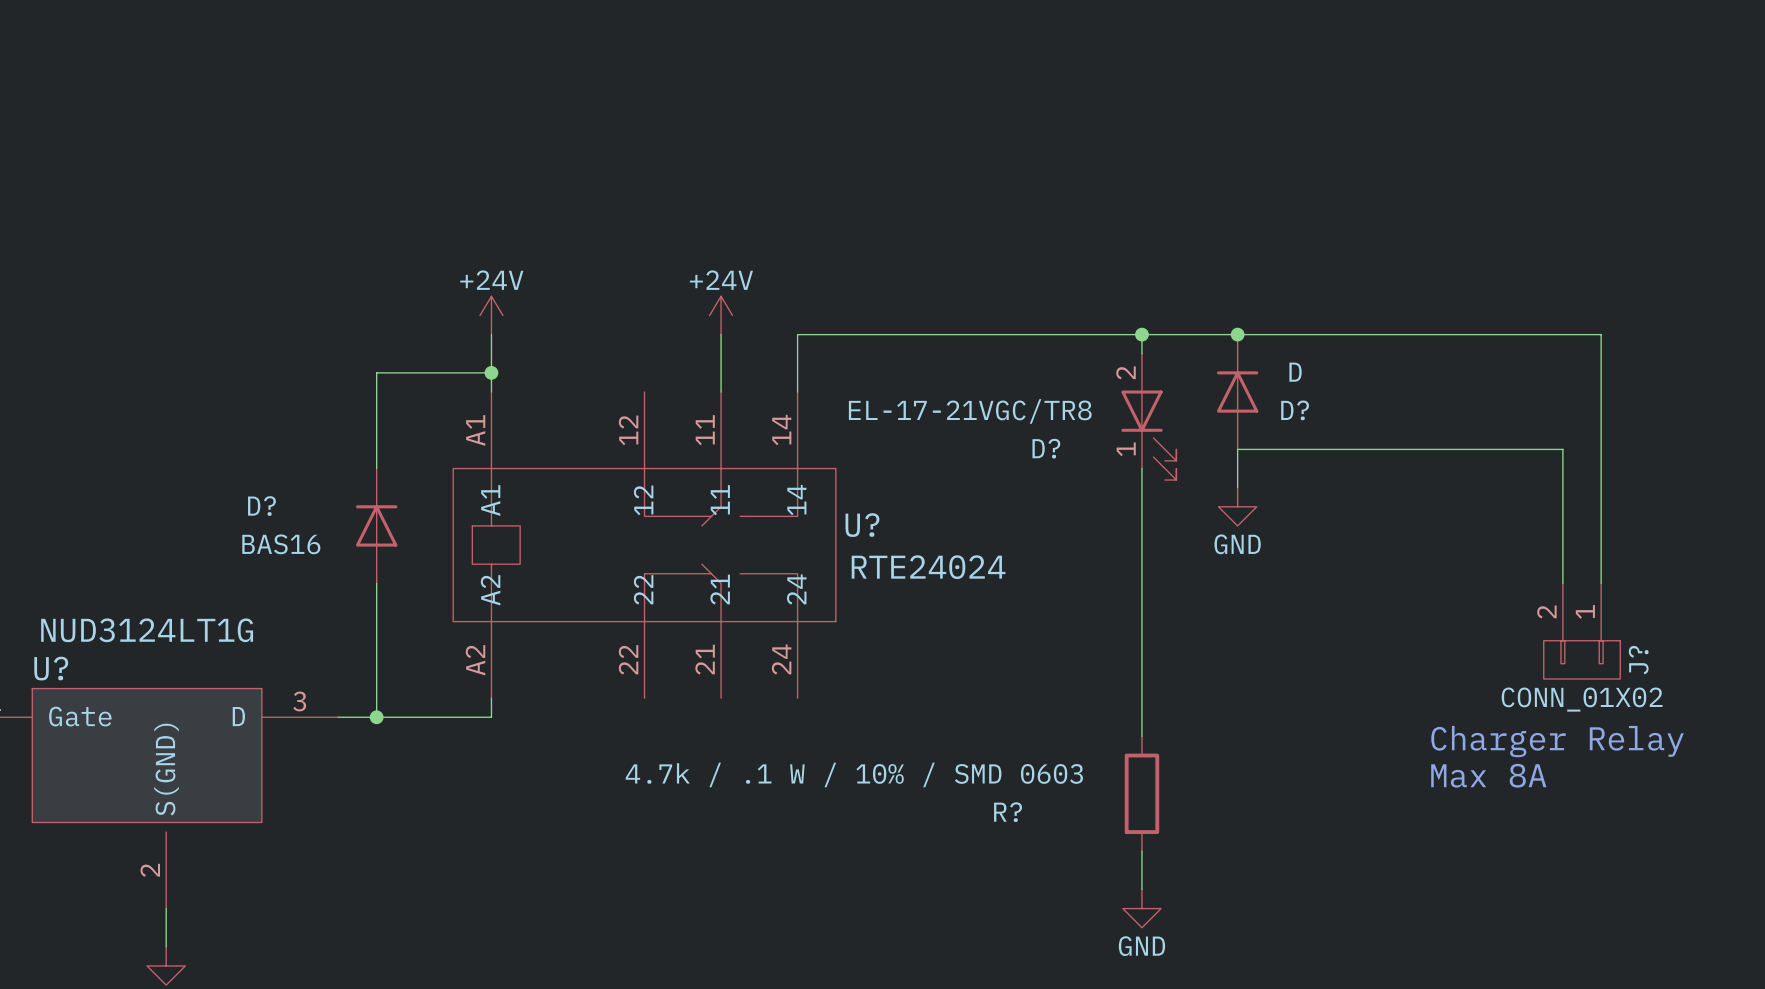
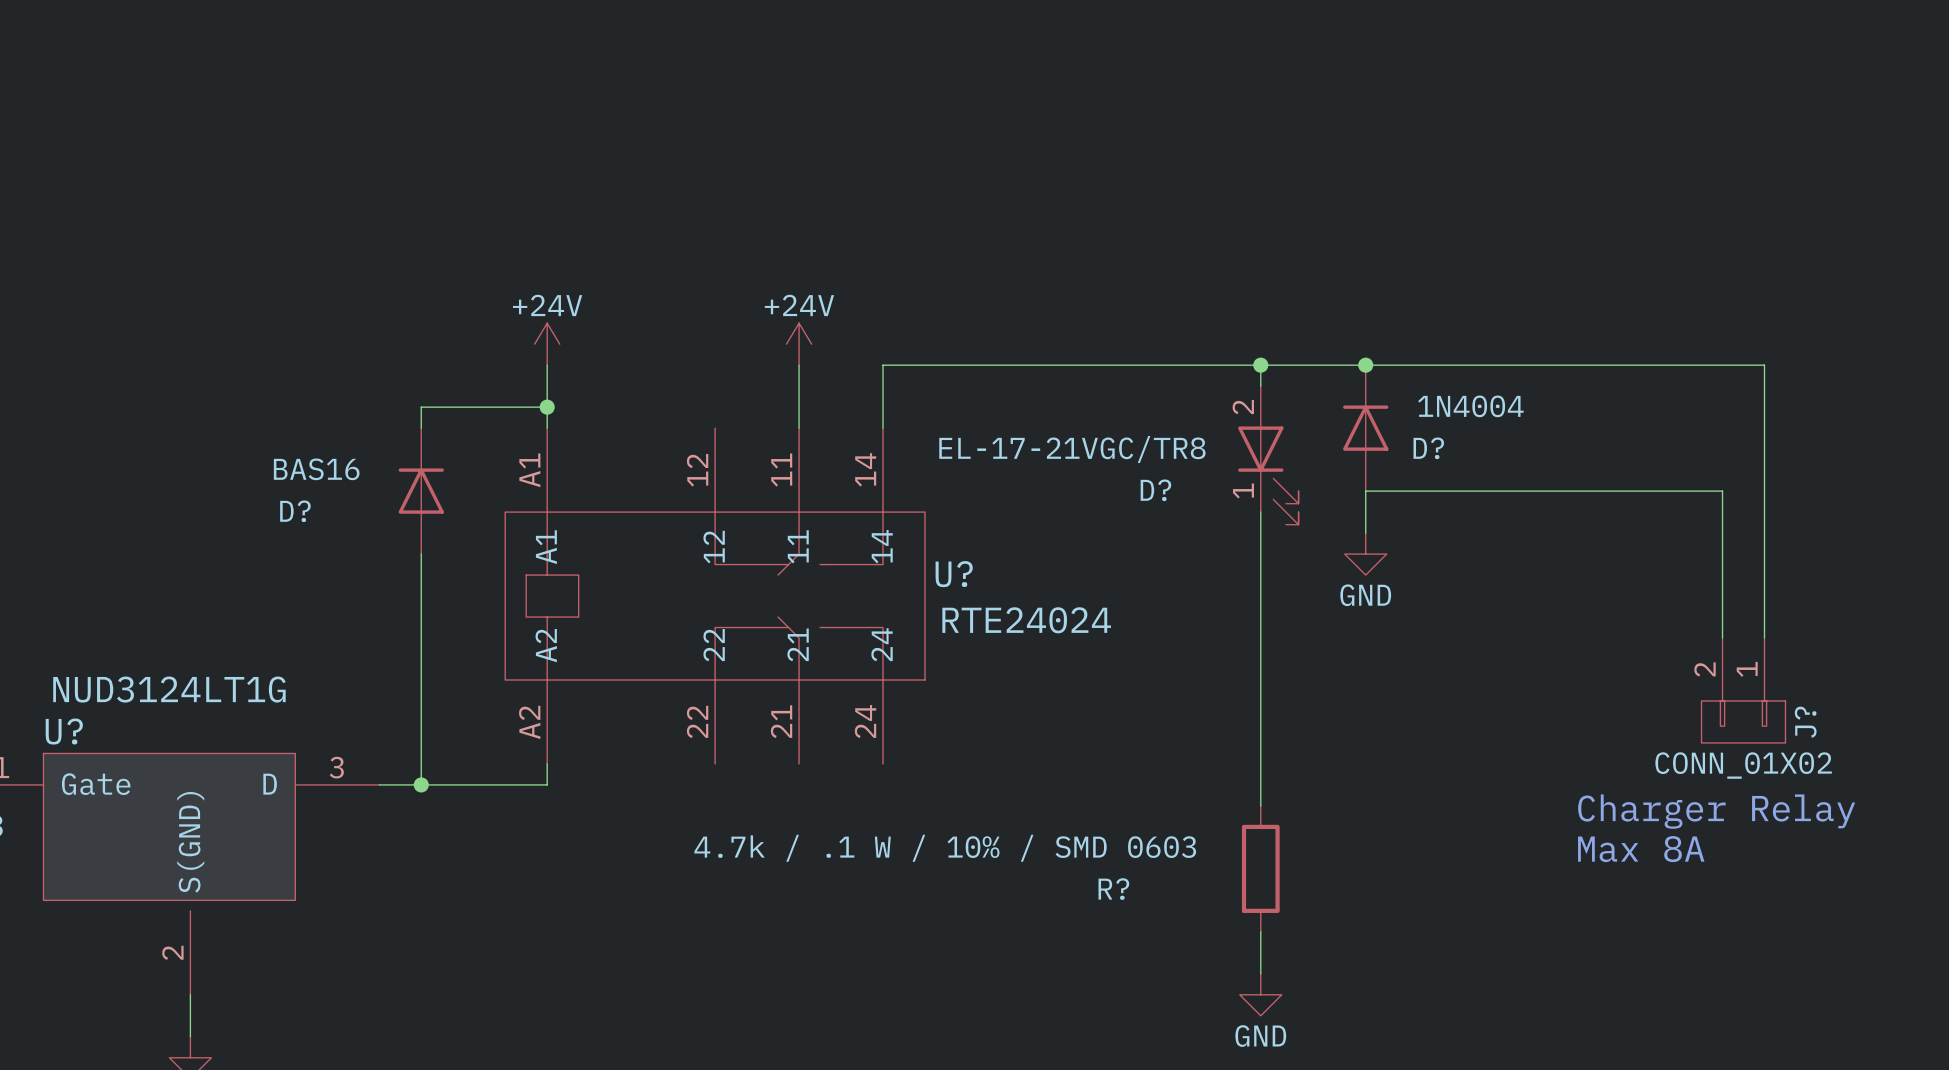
D? value: D (1295, 372) -> 1N4004 (1470, 406)
D? name position: D? (261, 506) -> D? (295, 511)
D? position: (376, 525) -> (421, 491)
D? value position: BAS16 (281, 544) -> BAS16 (316, 469)

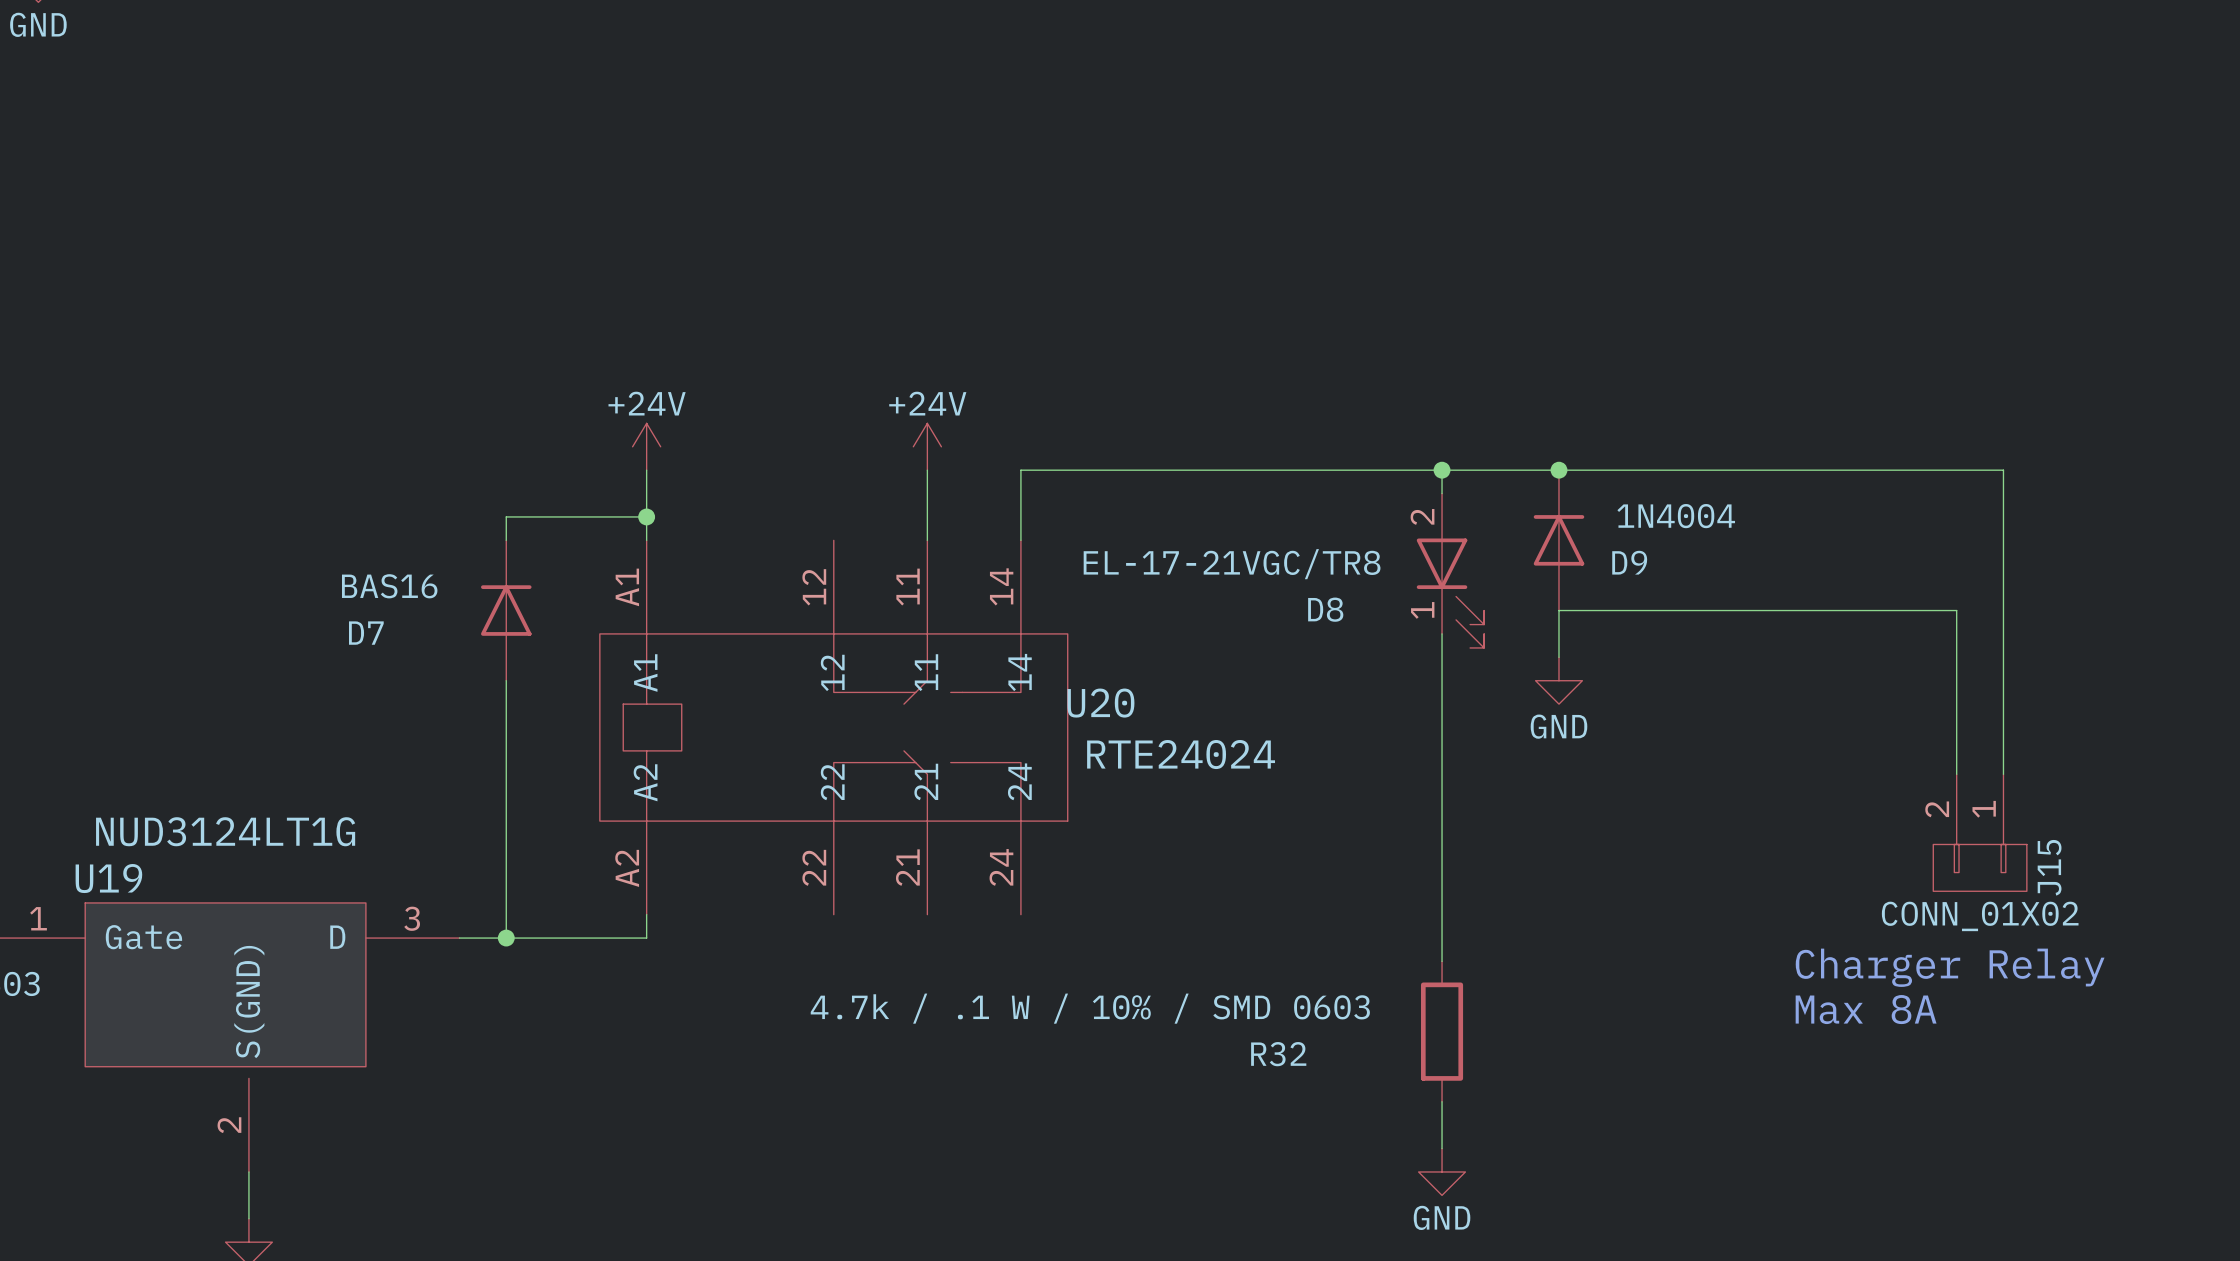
D? name: D? (1428, 448) -> D9 (1629, 562)
D? name: D? (1155, 490) -> D8 (1325, 609)
D? name: D? (295, 511) -> D7 (366, 633)
U? name: U? (954, 574) -> U20 (1100, 703)
J? name: J? (1805, 722) -> J15 (2049, 867)
U? name: U? (64, 731) -> U19 (108, 878)
R? name: R? (1113, 889) -> R32 (1278, 1054)

